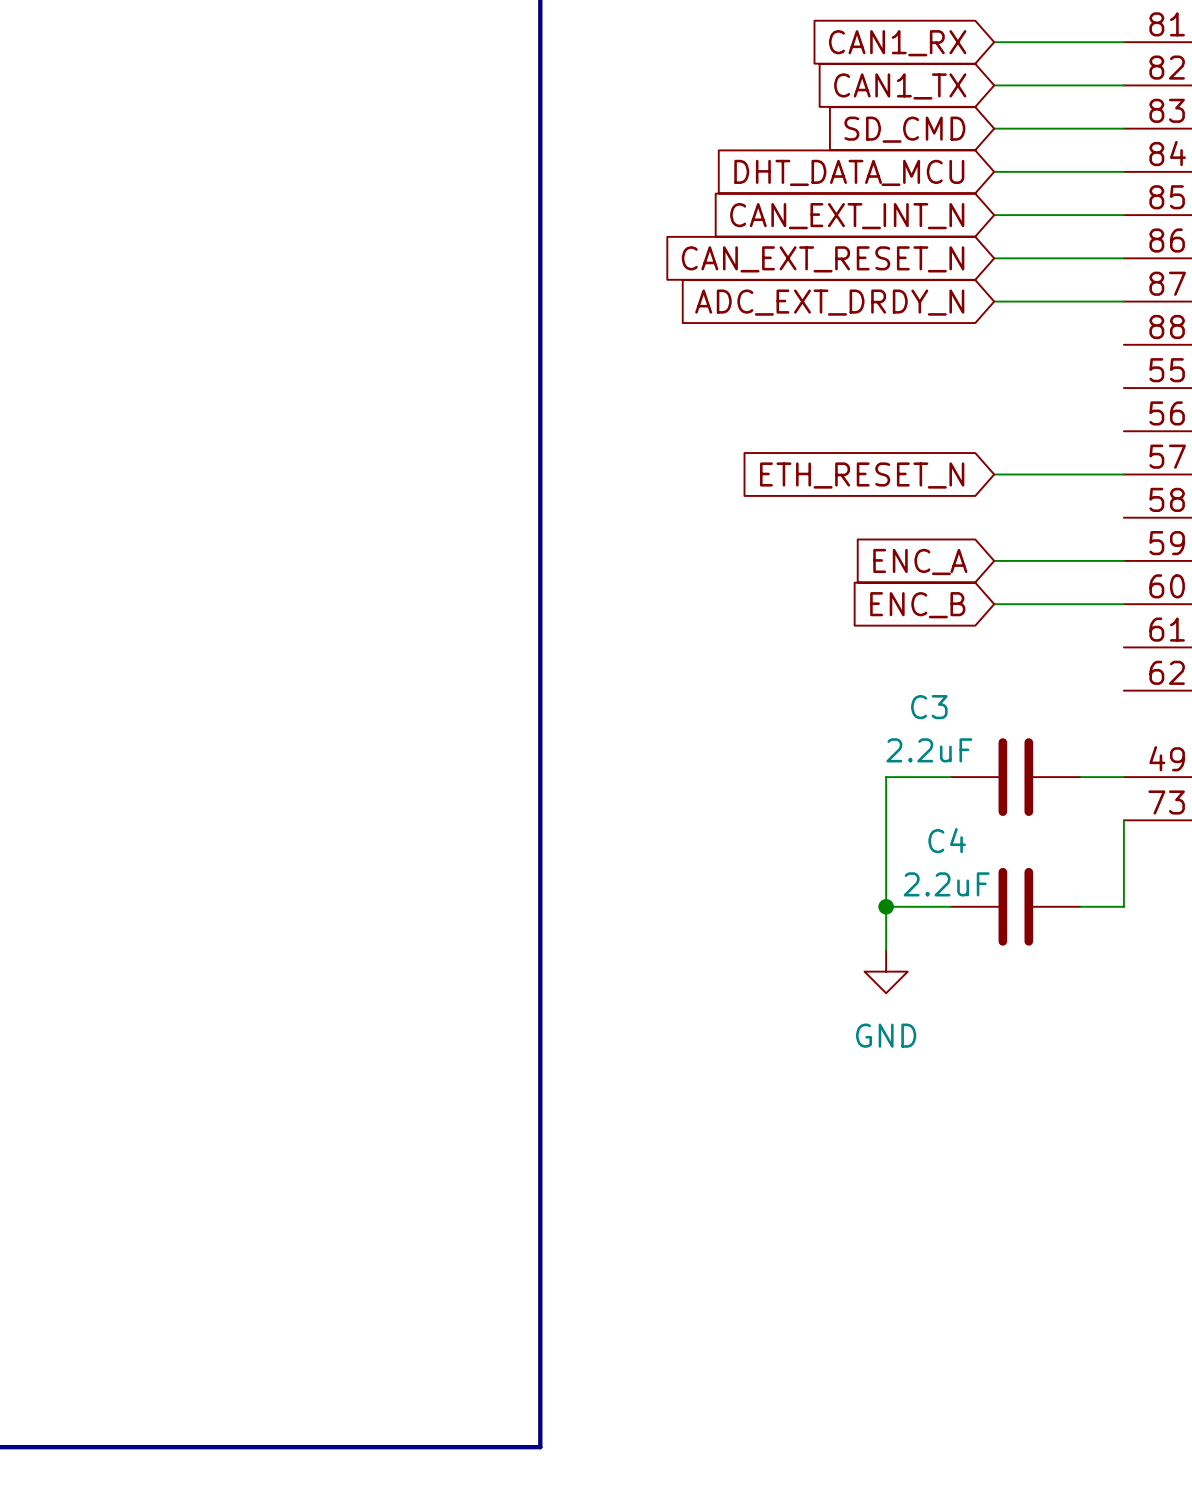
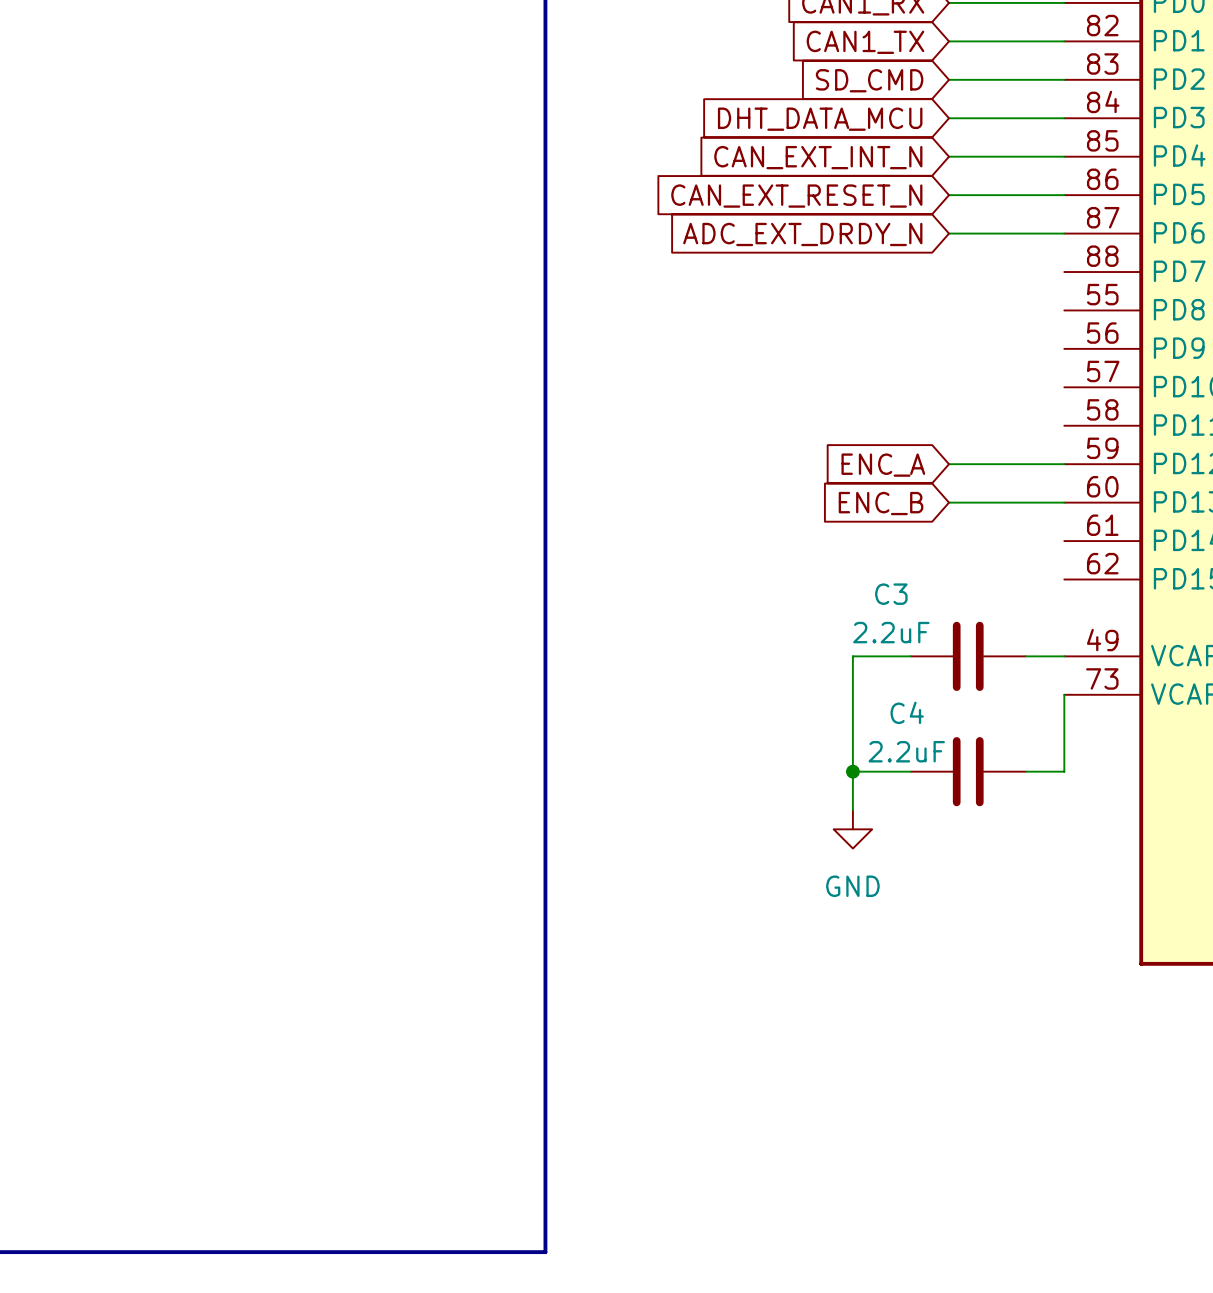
wire: (994, 474) (1123, 474) -> none
global label: ETH_RESET_N (862, 475) -> none

